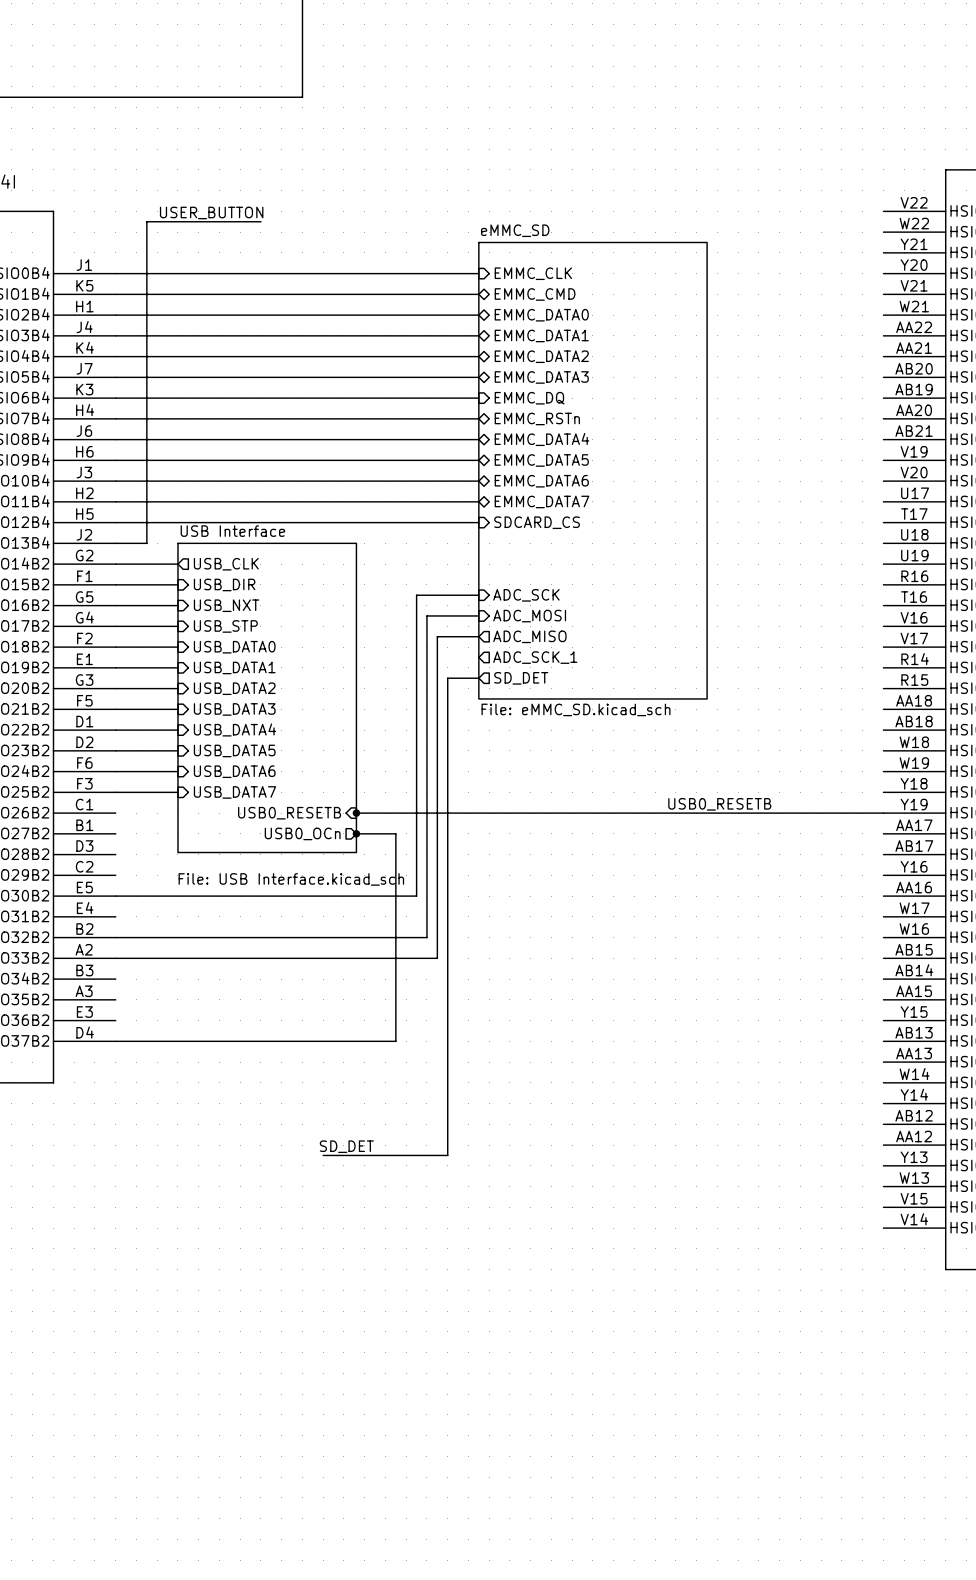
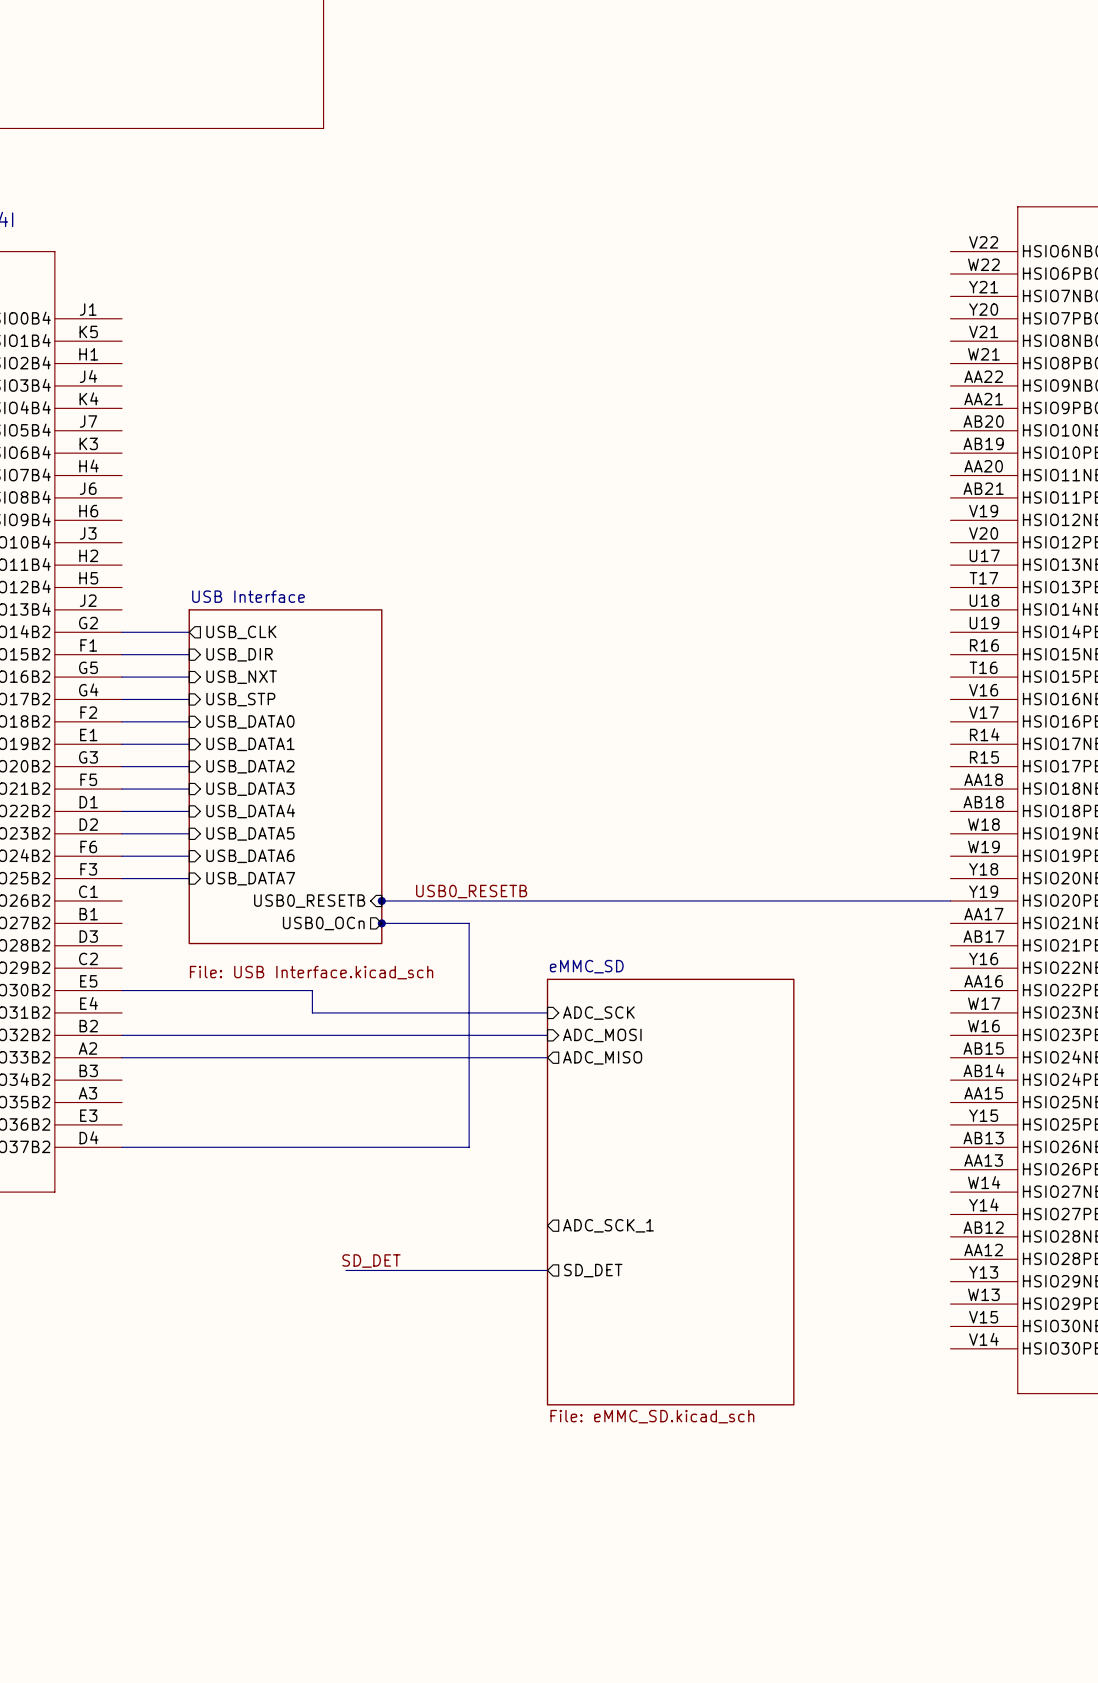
label: USER_BUTTON (211, 212) -> none
wire: (260, 221) (146, 221) (146, 543) (115, 543) -> none
wire: (115, 273) (478, 273) -> none
sheet pin: EMMC_CLK (533, 273) -> none
wire: (115, 294) (478, 294) -> none
sheet pin: EMMC_CMD (535, 294) -> none
wire: (115, 315) (478, 315) -> none
sheet pin: EMMC_DATA0 (541, 315) -> none
wire: (115, 335) (478, 335) -> none
sheet pin: EMMC_DATA1 (541, 335) -> none
wire: (115, 356) (478, 356) -> none
sheet pin: EMMC_DATA2 (541, 356) -> none
wire: (115, 377) (478, 377) -> none
sheet pin: EMMC_DATA3 (541, 377) -> none
wire: (115, 398) (478, 398) -> none
sheet pin: EMMC_DQ (529, 398) -> none
wire: (115, 418) (478, 418) -> none
sheet pin: EMMC_RSTn (537, 418) -> none
wire: (115, 439) (478, 439) -> none
sheet pin: EMMC_DATA4 (542, 439) -> none
wire: (115, 460) (478, 460) -> none
sheet pin: EMMC_DATA5 (541, 460) -> none
sheet eMMC_SD: File: eMMC_SD.kicad_sch (592, 470) -> none
wire: (115, 481) (478, 481) -> none
sheet pin: EMMC_DATA6 (541, 481) -> none
wire: (115, 501) (478, 501) -> none
sheet pin: EMMC_DATA7 (542, 501) -> none
wire: (115, 522) (478, 522) -> none
sheet pin: SDCARD_CS (537, 522) -> none
wire: (478, 595) (416, 595) (416, 896) (292, 896) -> (547, 1012) (312, 1012) (312, 990)
sheet pin: ADC_SCK (526, 595) -> none
wire: (478, 615) (426, 615) (426, 937) -> (547, 1035) (457, 1035)
sheet pin: ADC_MOSI (529, 616) -> none
wire: (478, 636) (437, 636) (437, 833) -> (424, 923) (469, 923)
sheet pin: ADC_MISO (529, 636) -> none
sheet pin: ADC_SCK_1 (535, 657) -> none
wire: (478, 678) (447, 678) (447, 1155) -> (547, 1270) (480, 1270)
sheet pin: SD_DET (521, 678) -> none
label: none -> USB0_RESETB (471, 891)
label: USB0_RESETB (719, 804) -> none
wire: (395, 833) (395, 1041) -> (547, 1057) (469, 1057) (469, 1147) (424, 1147)
sheet pin: none -> ADC_SCK (598, 1013)
sheet pin: none -> ADC_MOSI (602, 1035)
sheet pin: none -> ADC_MISO (602, 1057)
sheet eMMC_SD: none -> File: eMMC_SD.kicad_sch (670, 1192)
sheet pin: none -> ADC_SCK_1 (608, 1225)
sheet pin: none -> SD_DET (593, 1270)

